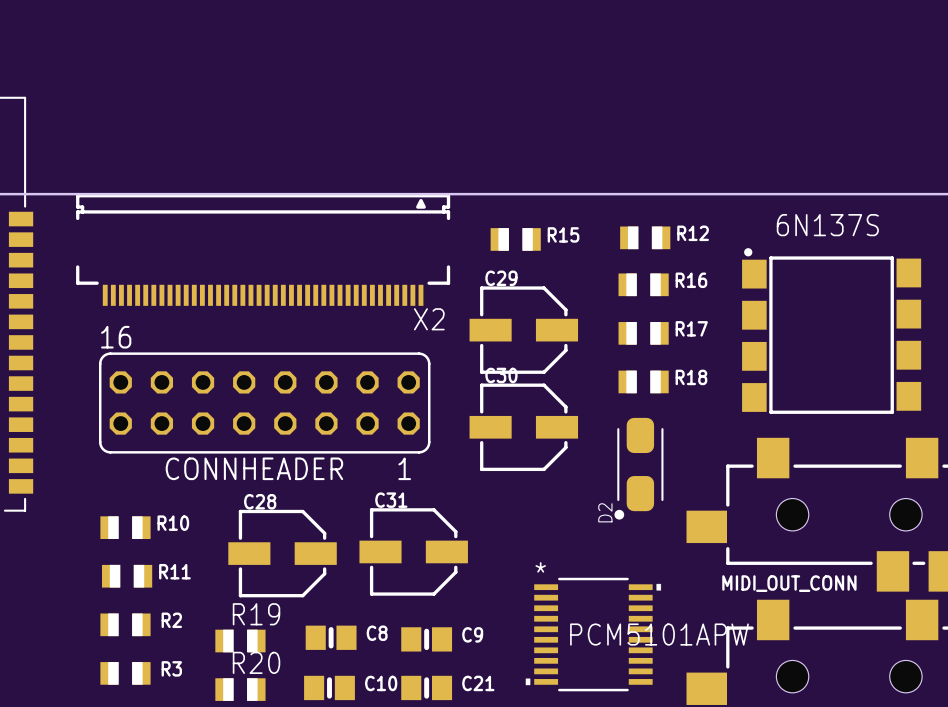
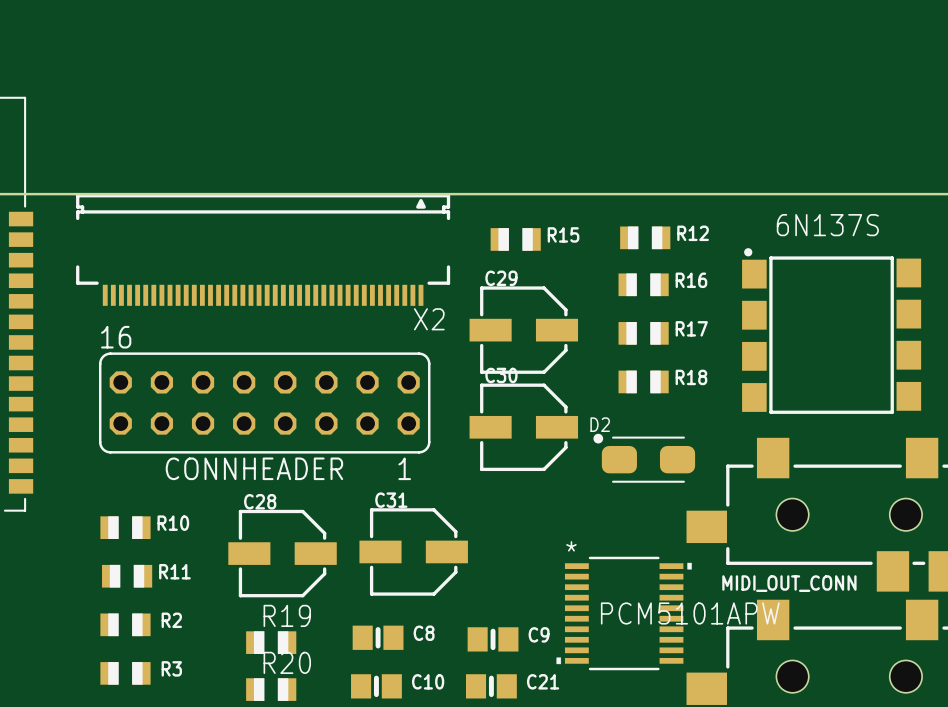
D2 rotation: 0° (638, 468) -> 90° clockwise (644, 458)
part position: (593, 634) -> (624, 613)
C8 position: (331, 637) -> (378, 637)
C9 position: (426, 639) -> (493, 639)
R19 position: (240, 641) -> (271, 642)
C10 position: (329, 687) -> (376, 686)
C21 position: (426, 687) -> (491, 686)
R20 position: (240, 689) -> (271, 689)

